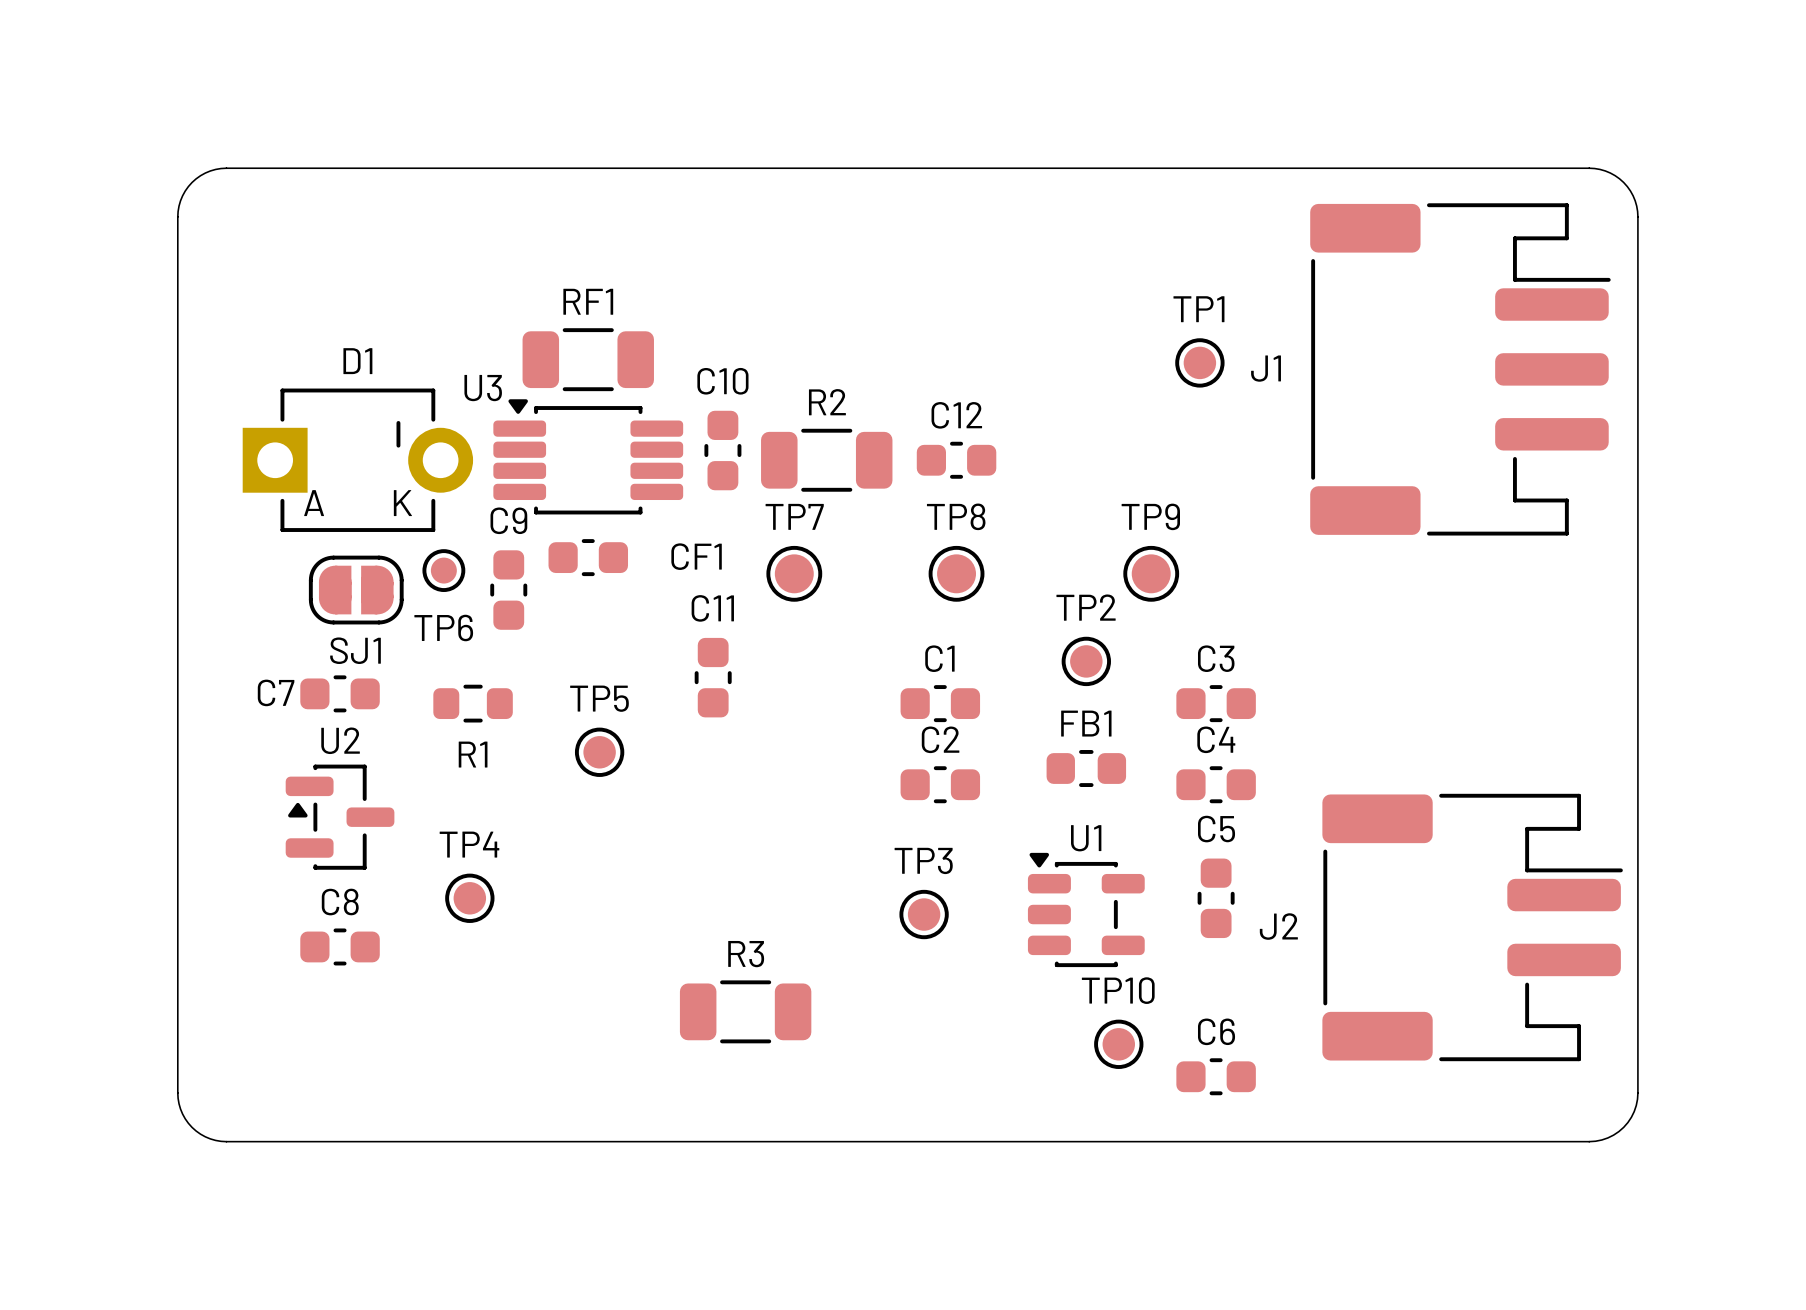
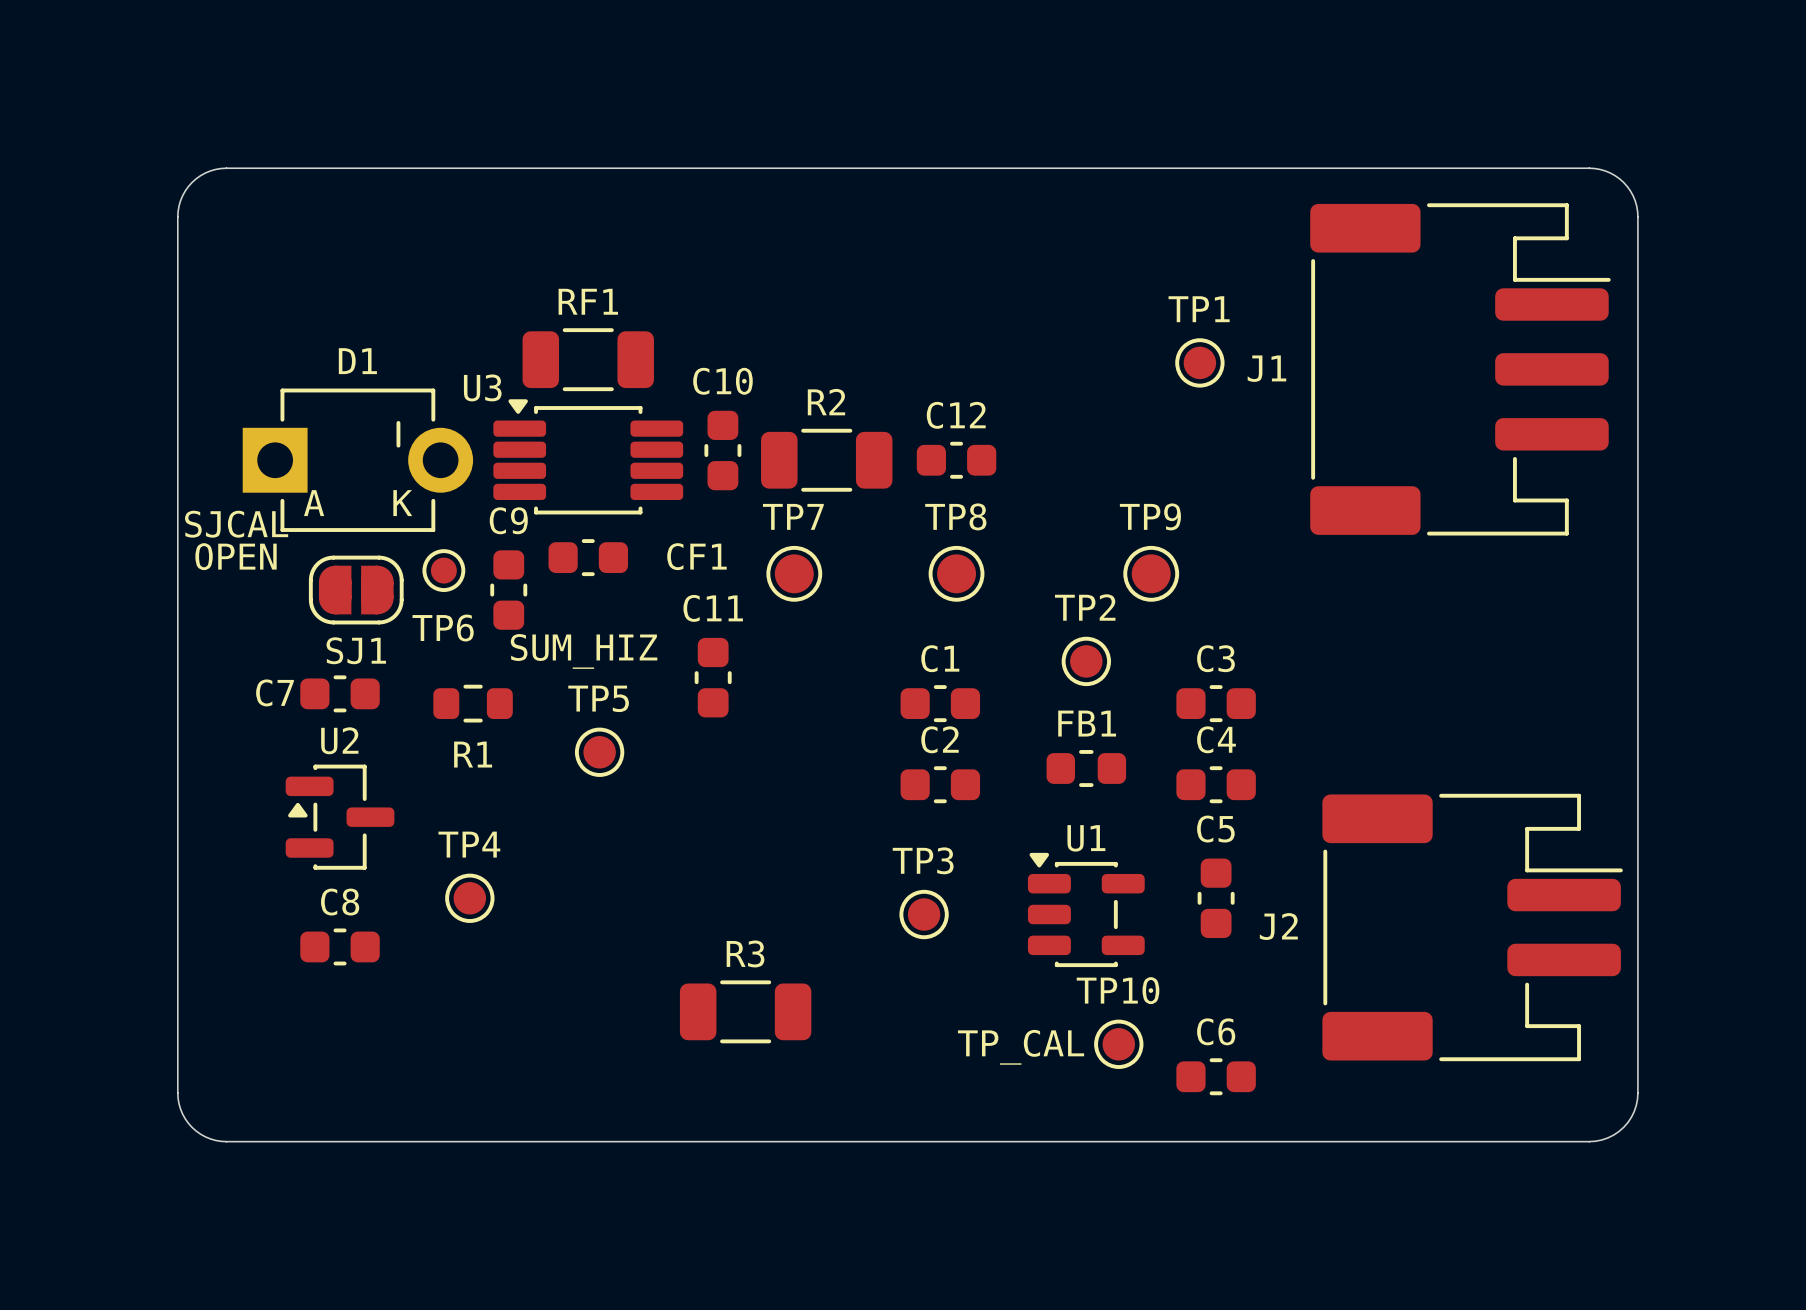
text: none -> SJCAL (236, 524)
text: none -> OPEN (236, 556)
text: none -> SUM_HIZ (584, 651)
text: none -> TP_CAL (1021, 1047)

